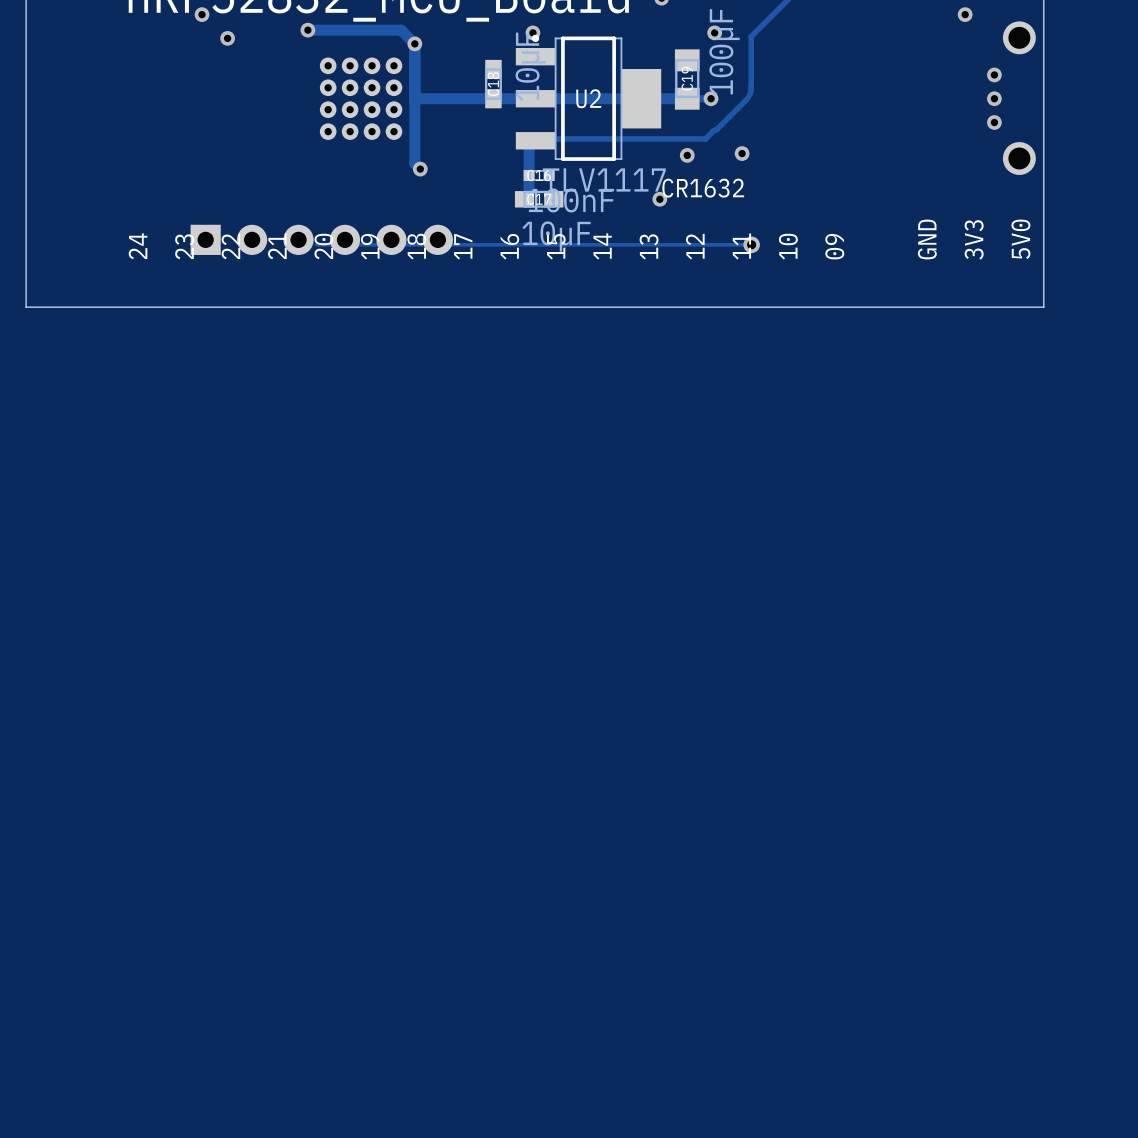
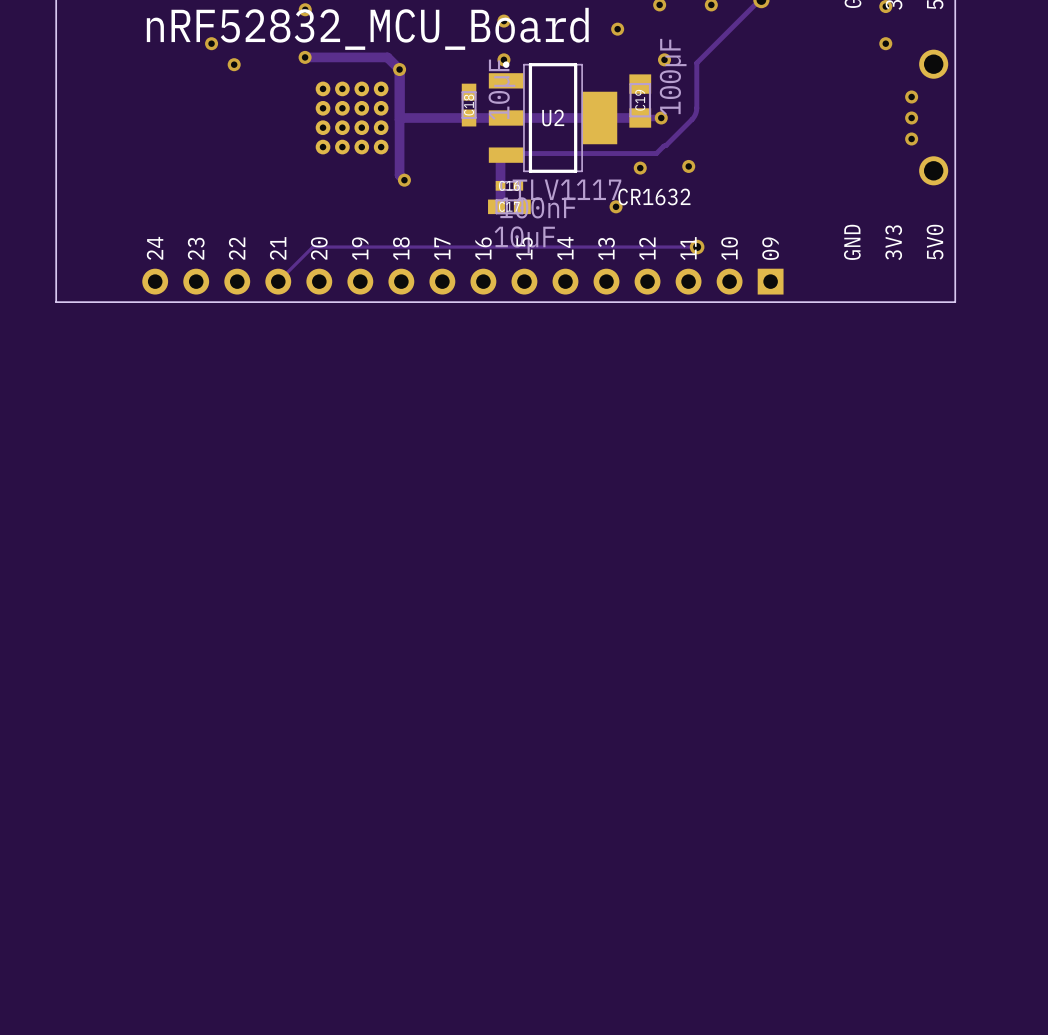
part: (321, 239) -> none
track: none -> (312, 247) (278, 281)
part: none -> (462, 281)

